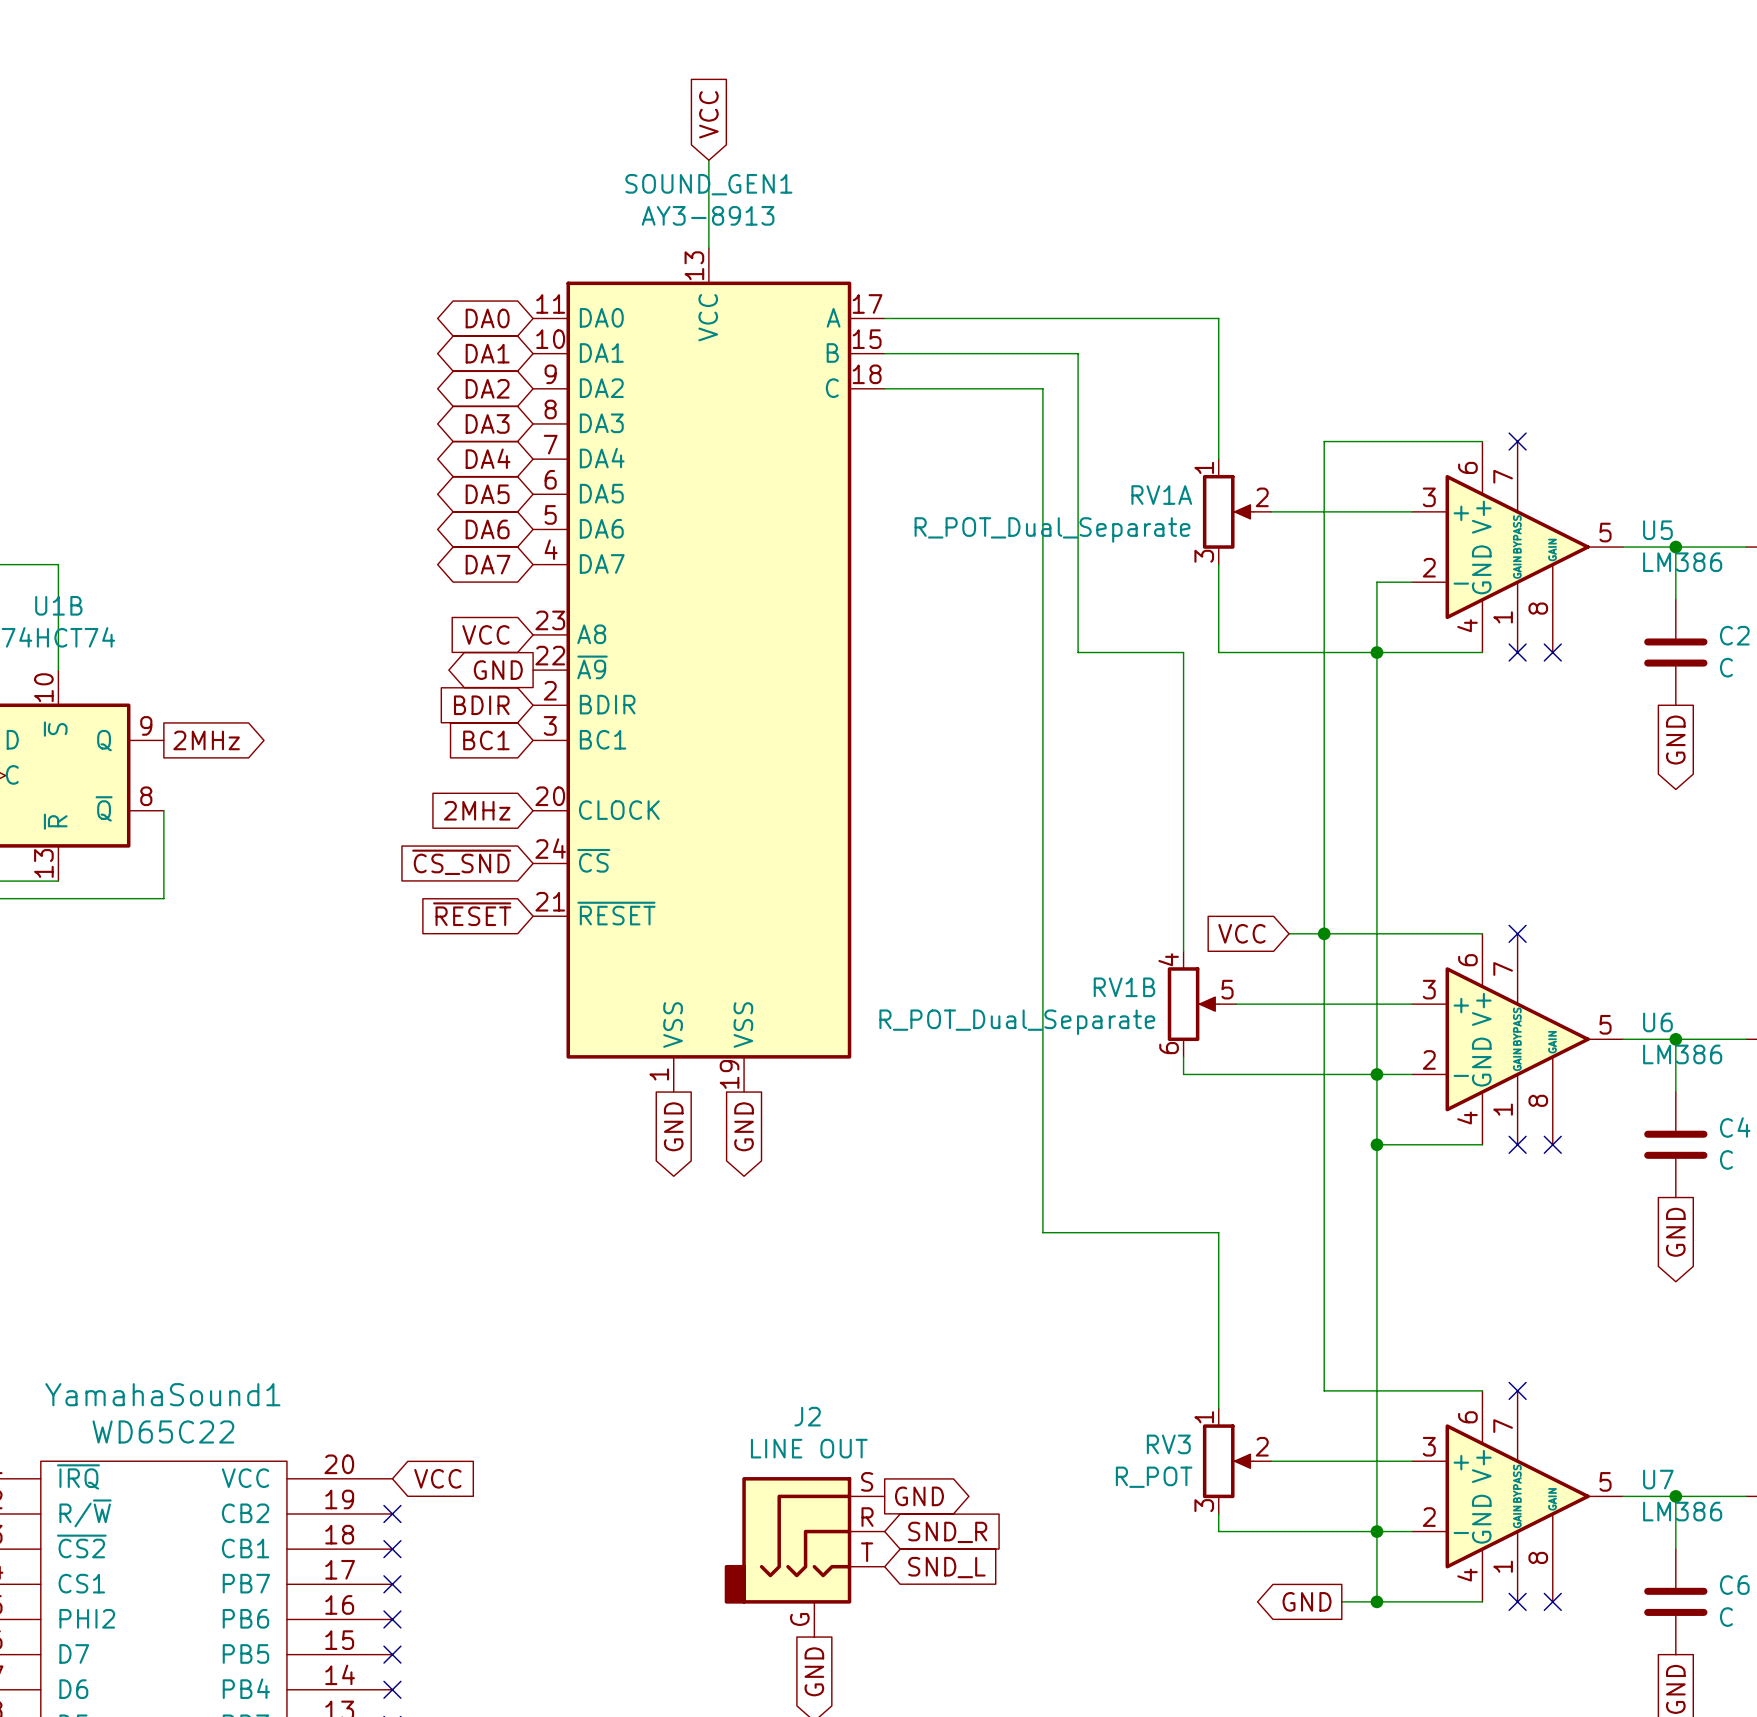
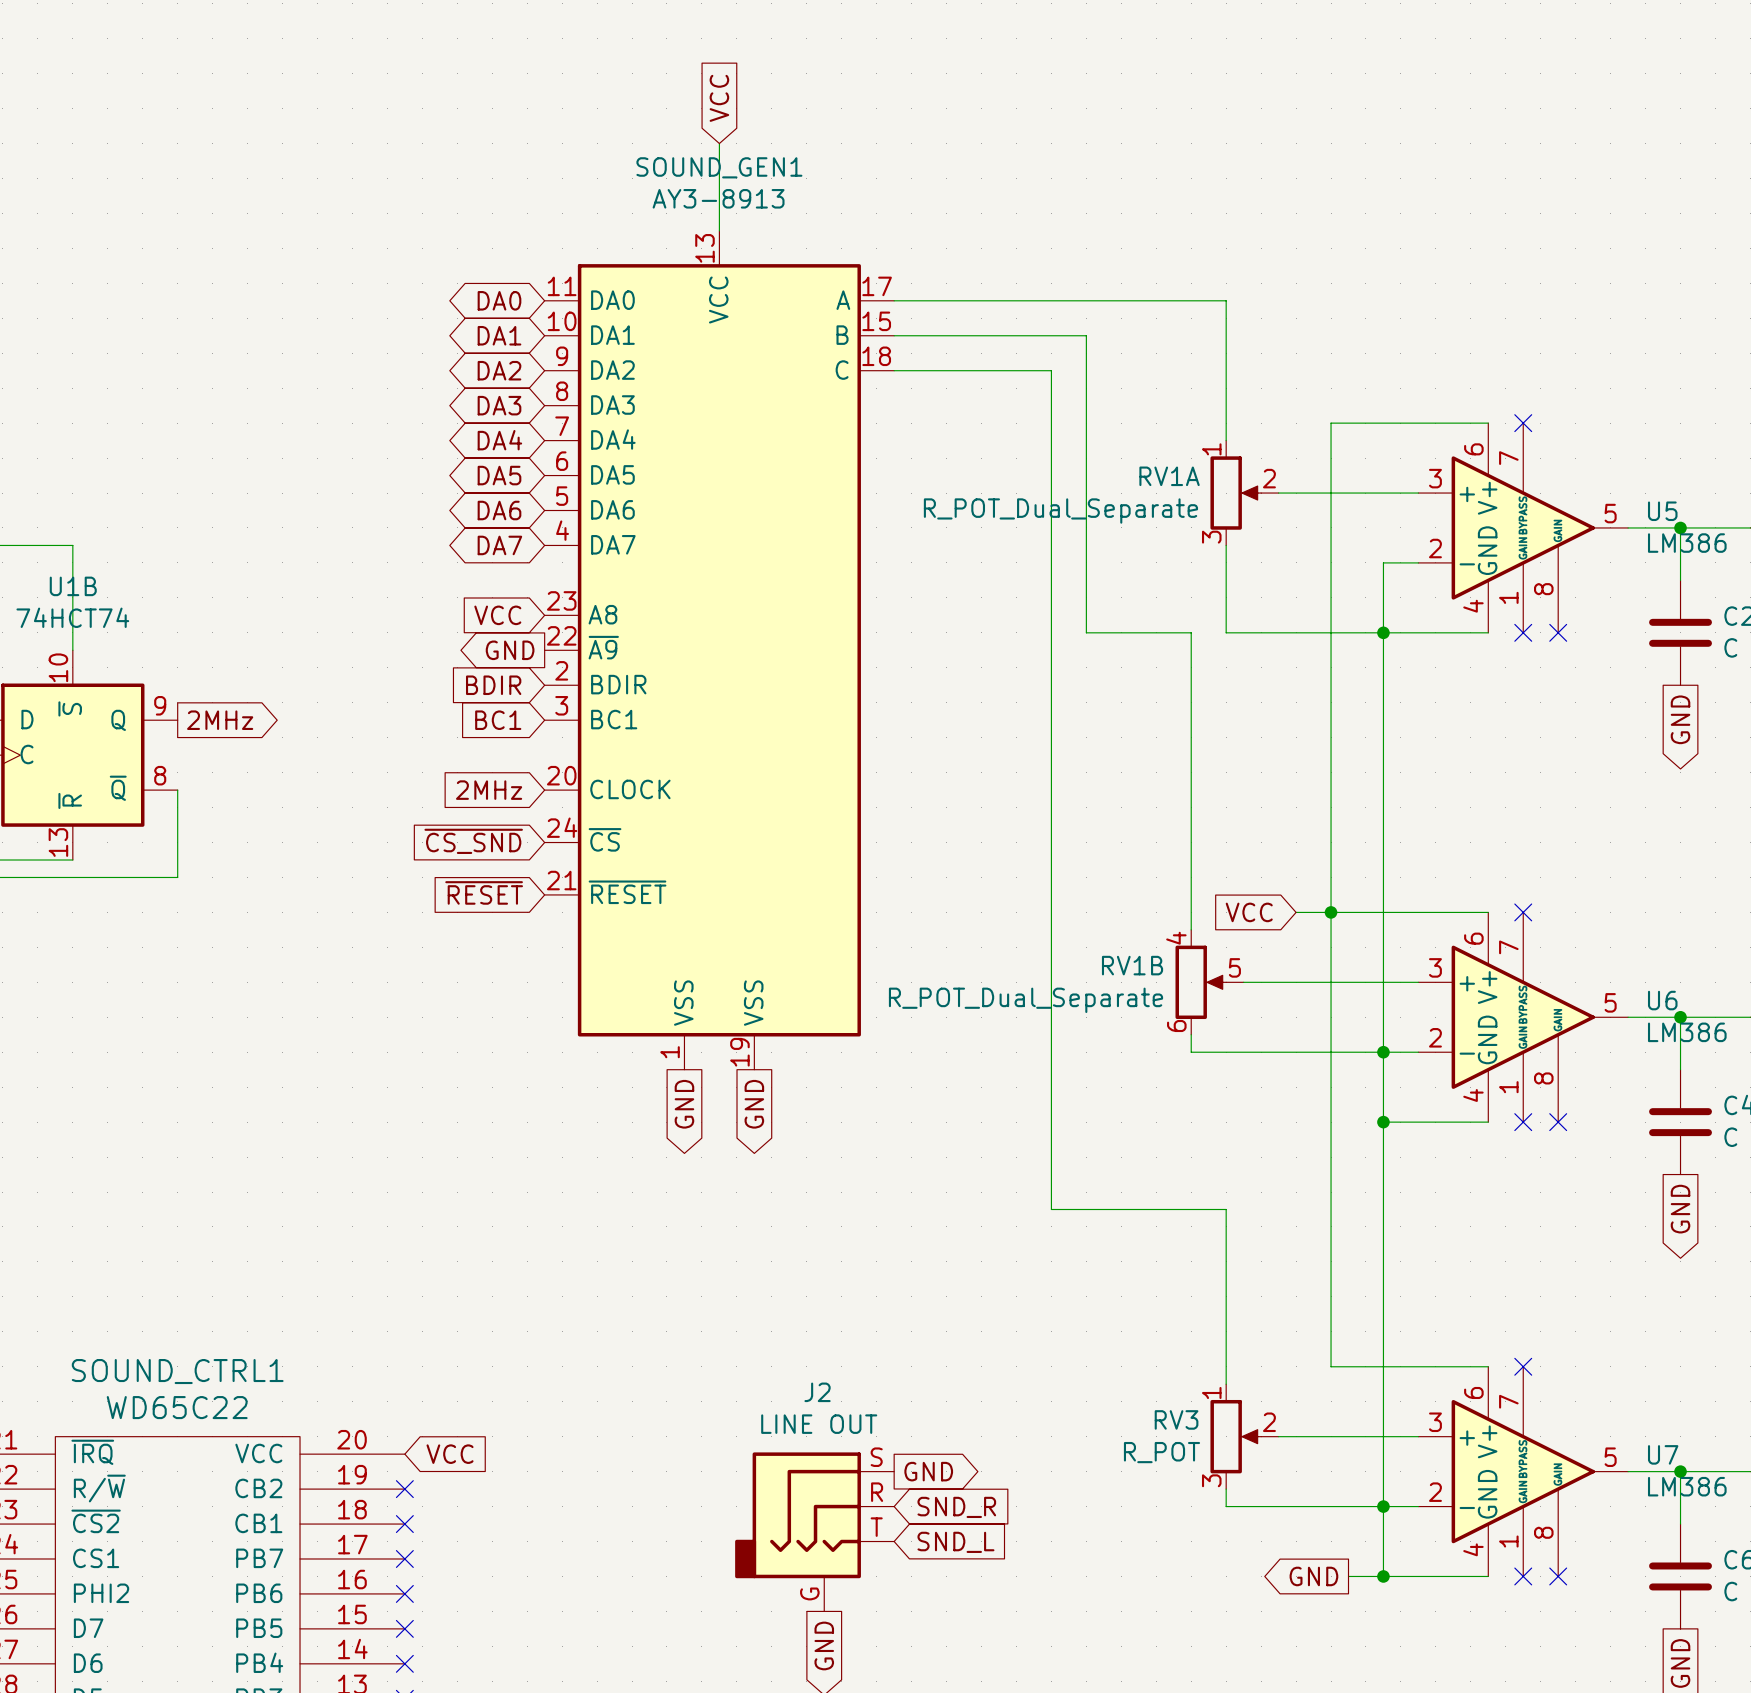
YamahaSound1 name: YamahaSound1 (162, 1394) -> SOUND_CTRL1 (177, 1371)

